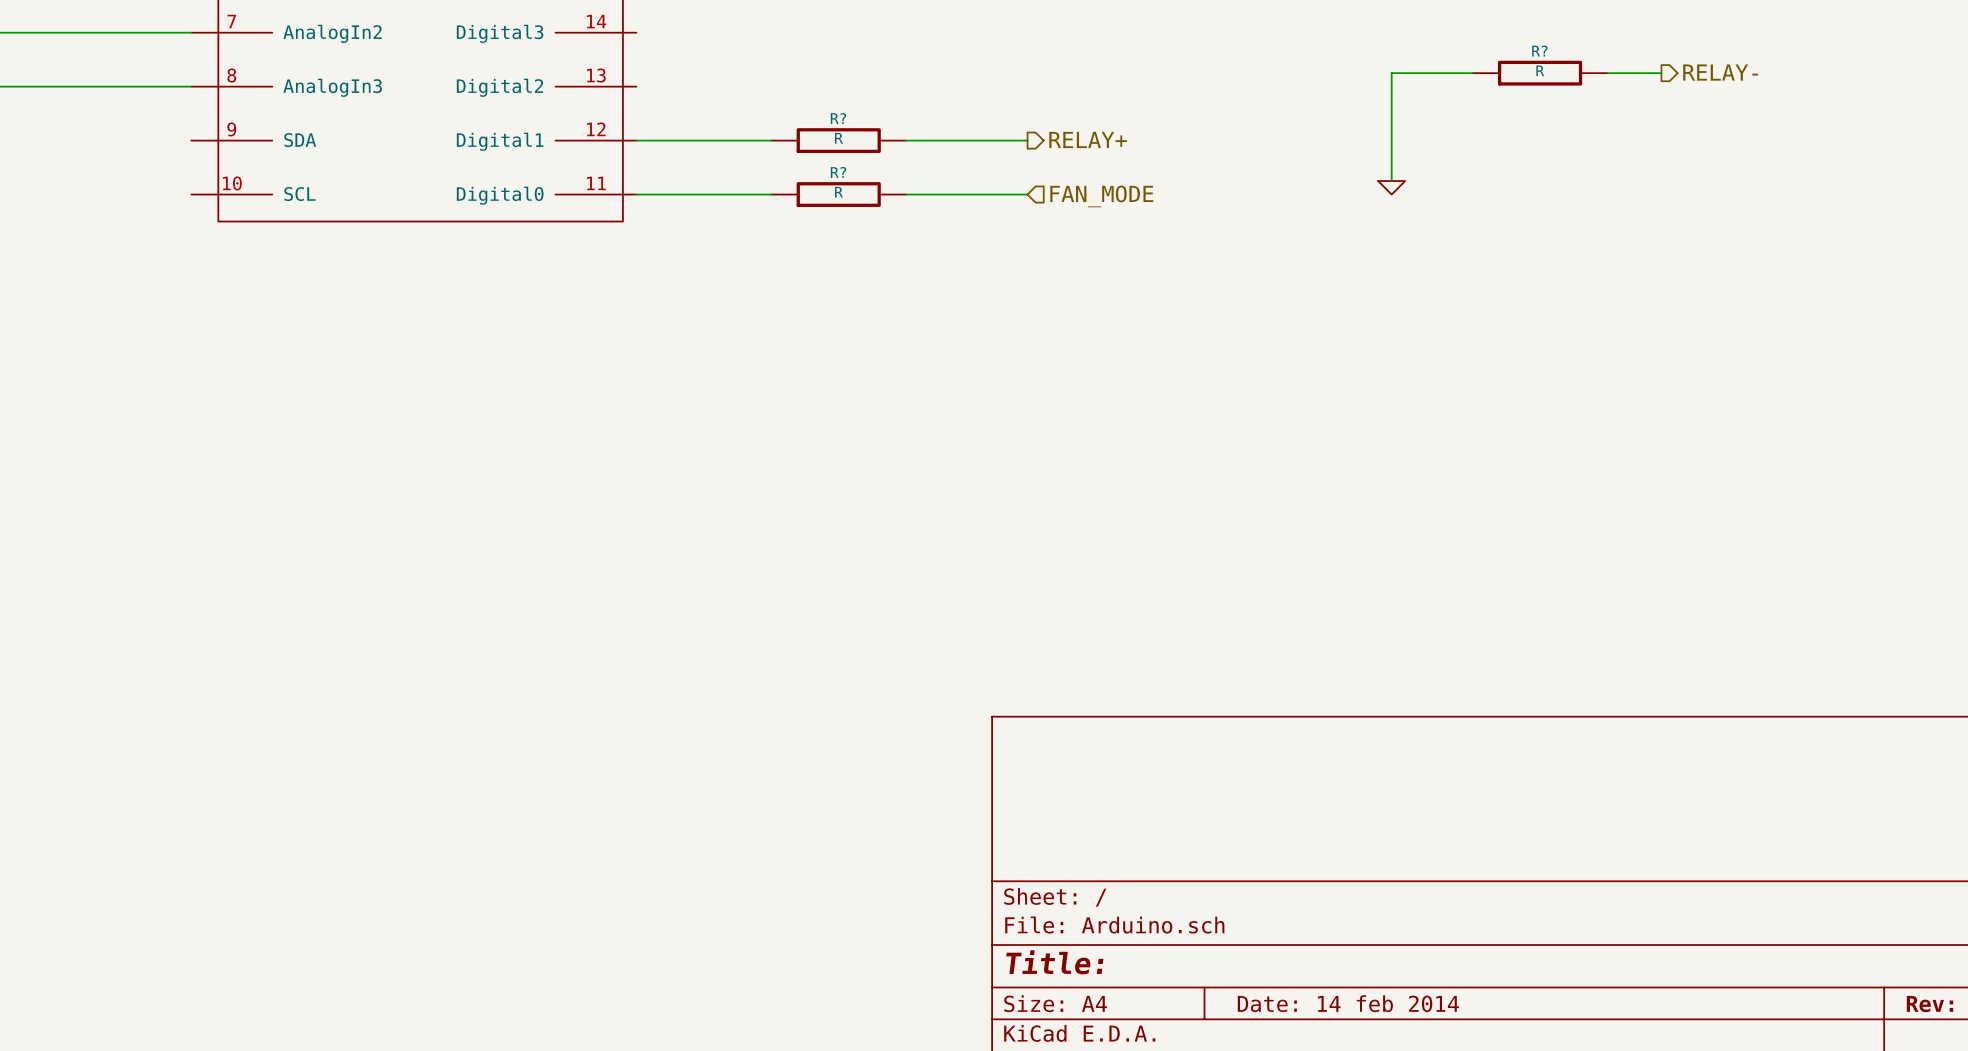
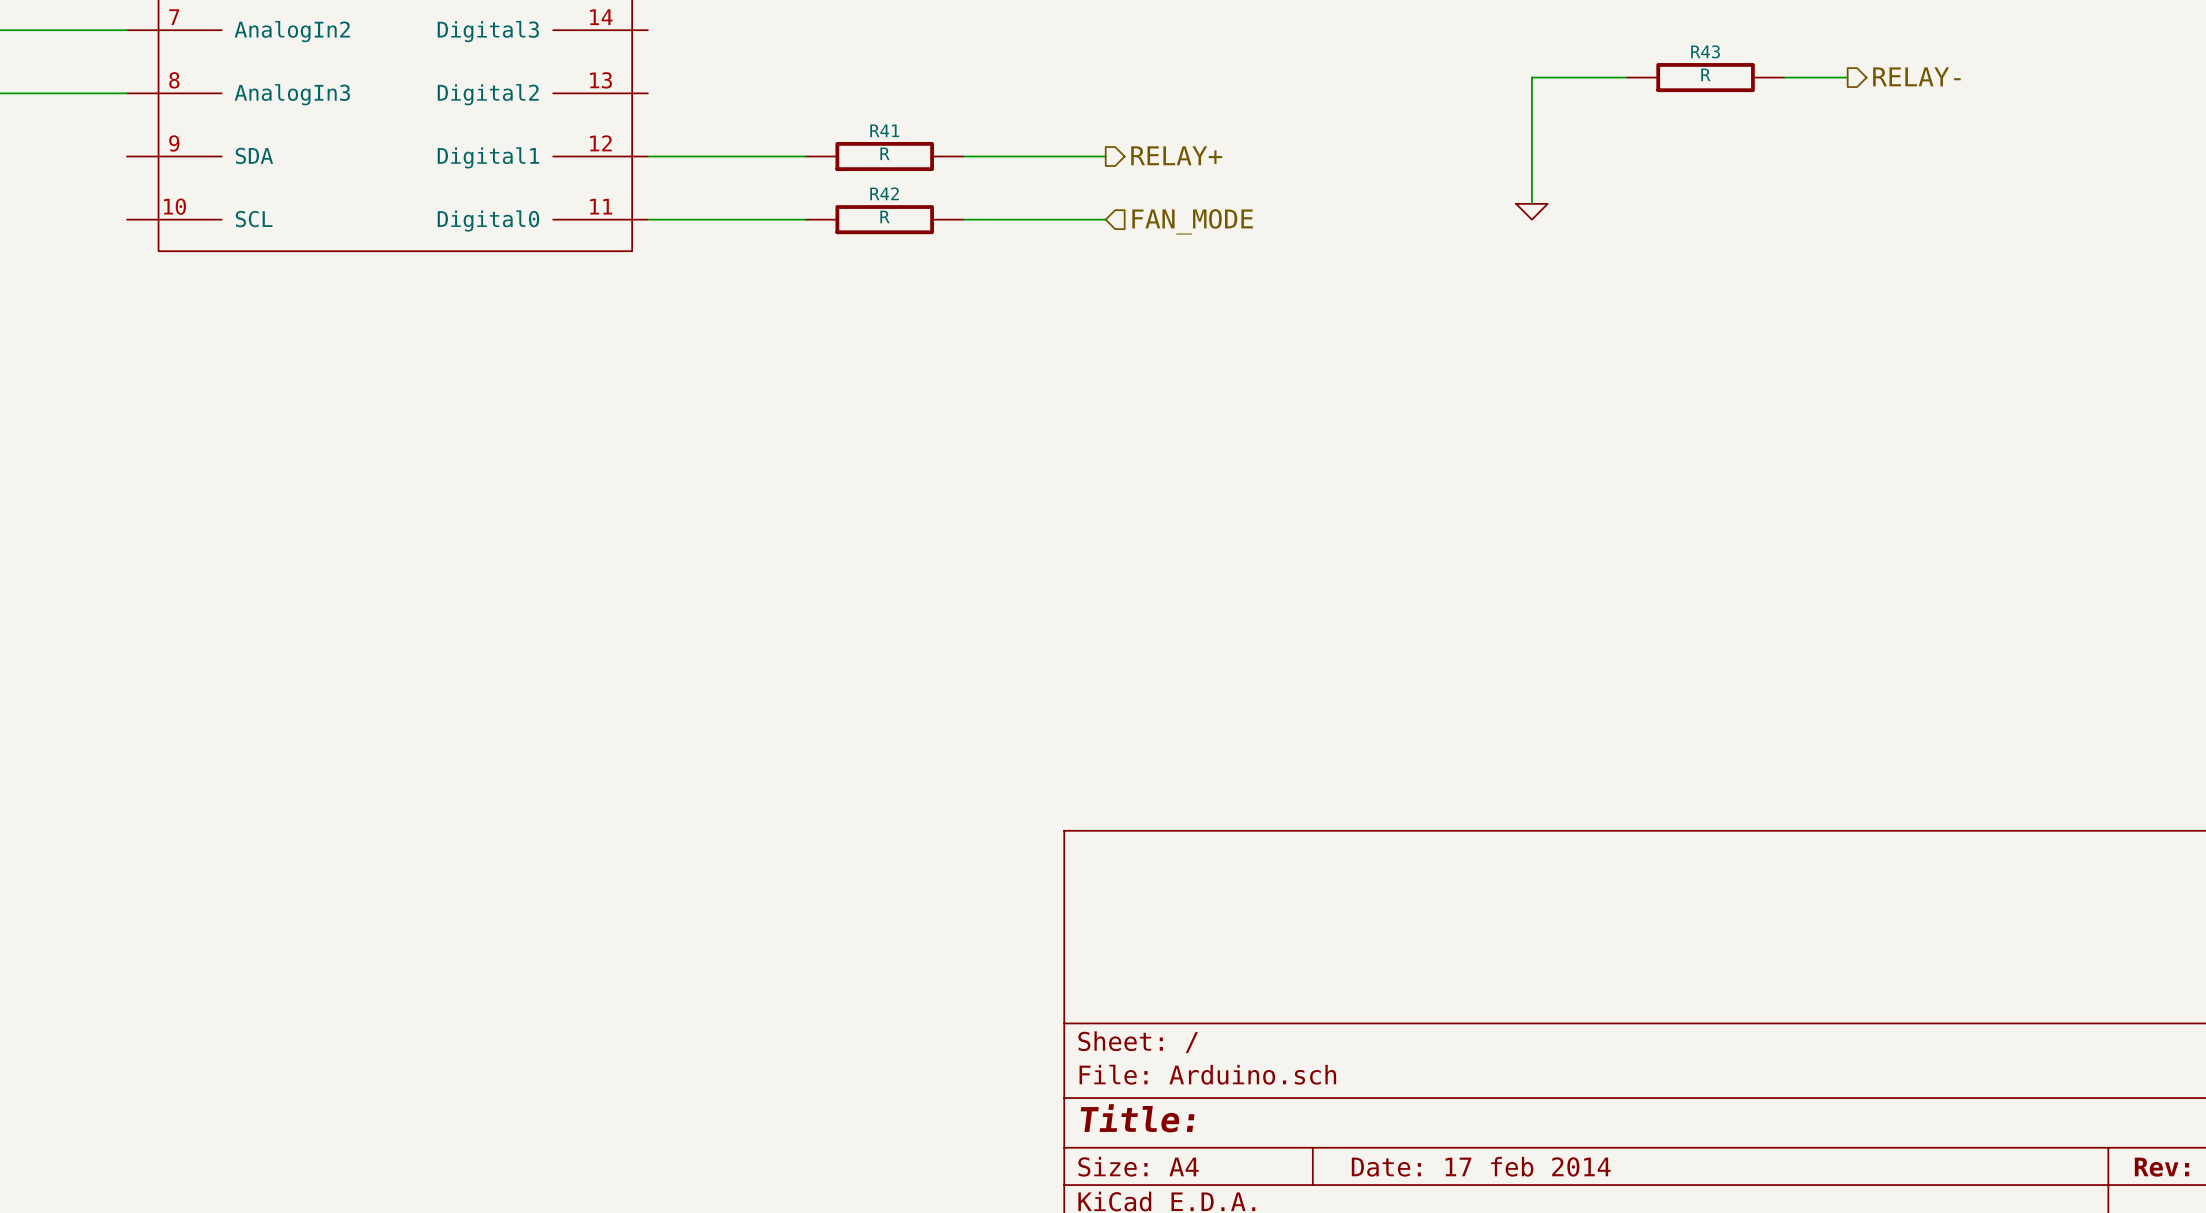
R? name: R? (1539, 51) -> R43 (1705, 51)
R? name: R? (838, 118) -> R41 (884, 130)
R? name: R? (838, 172) -> R42 (884, 193)
title block: Date: 14 feb 2014 (1348, 1003) -> Date: 17 feb 2014 (1481, 1166)

